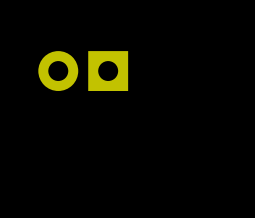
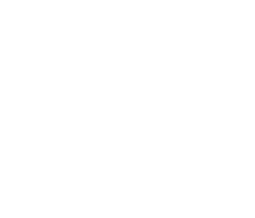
part: (83, 71) -> none

